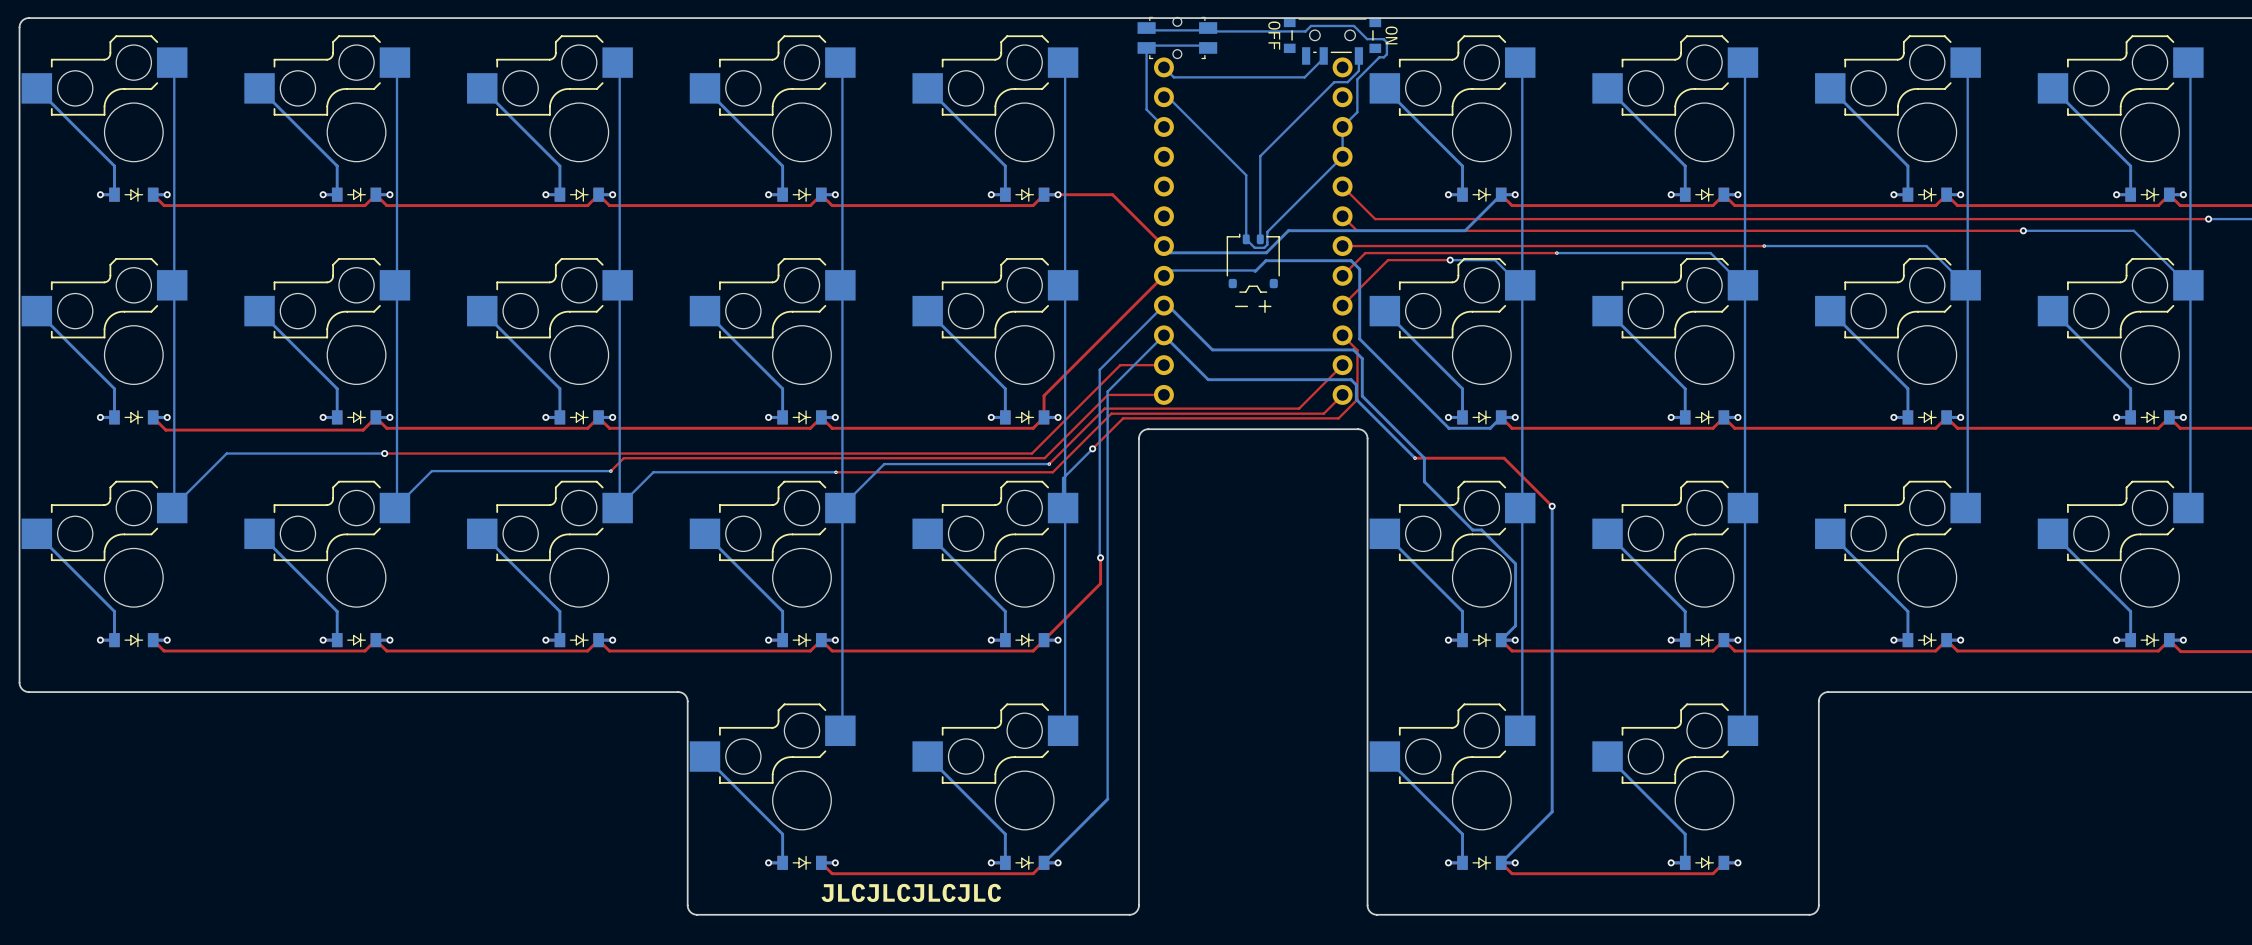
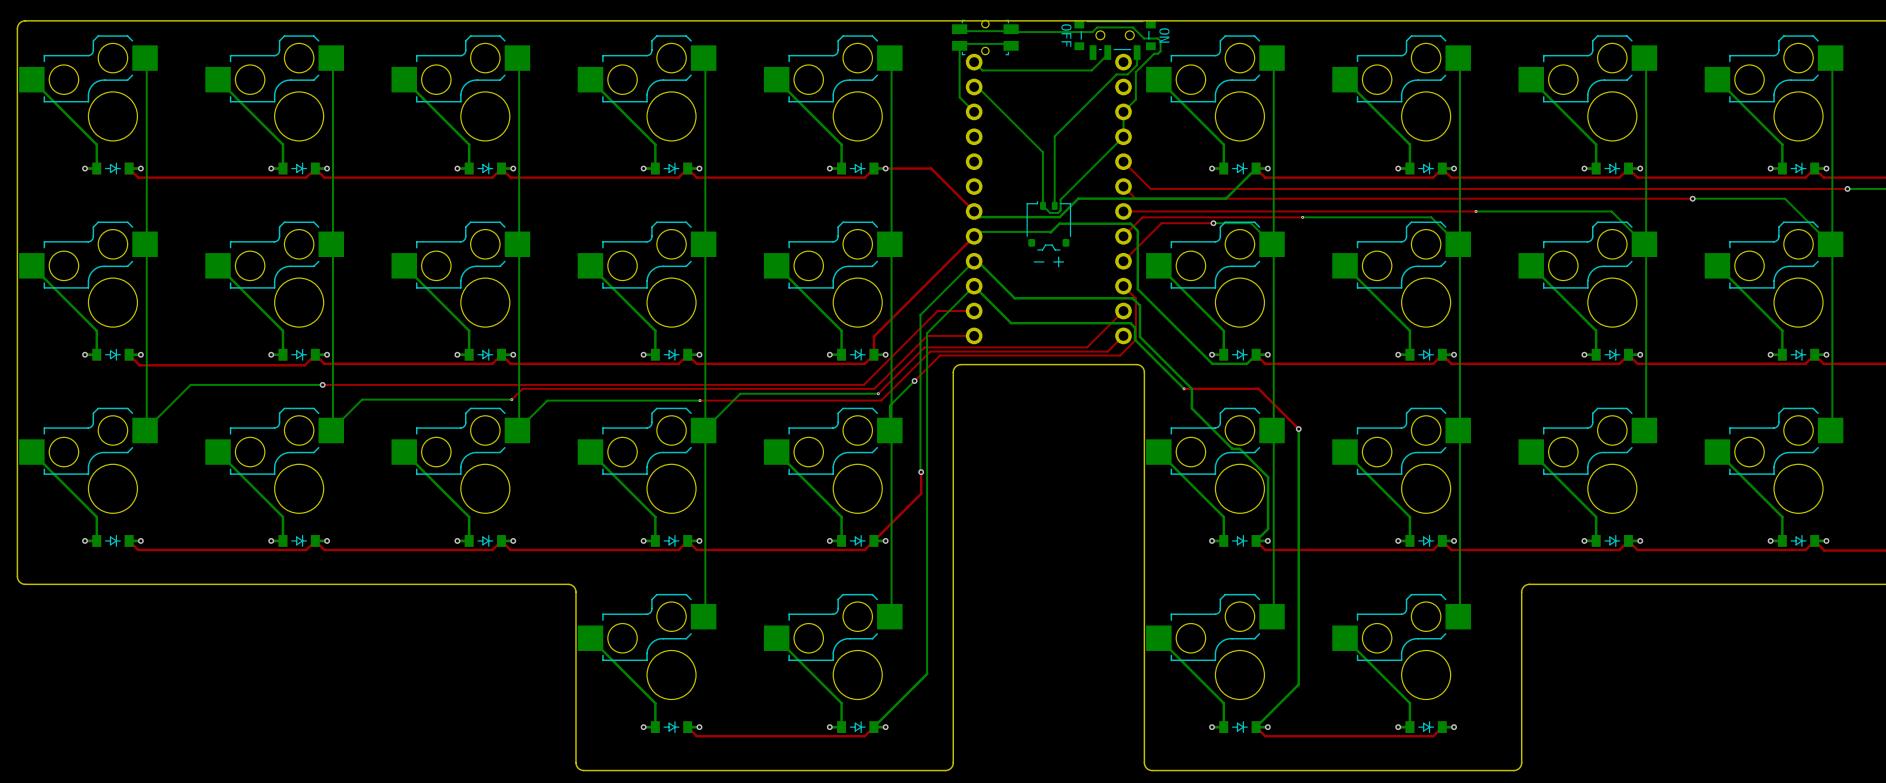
text: JLCJLCJLCJLC (911, 892) -> none

